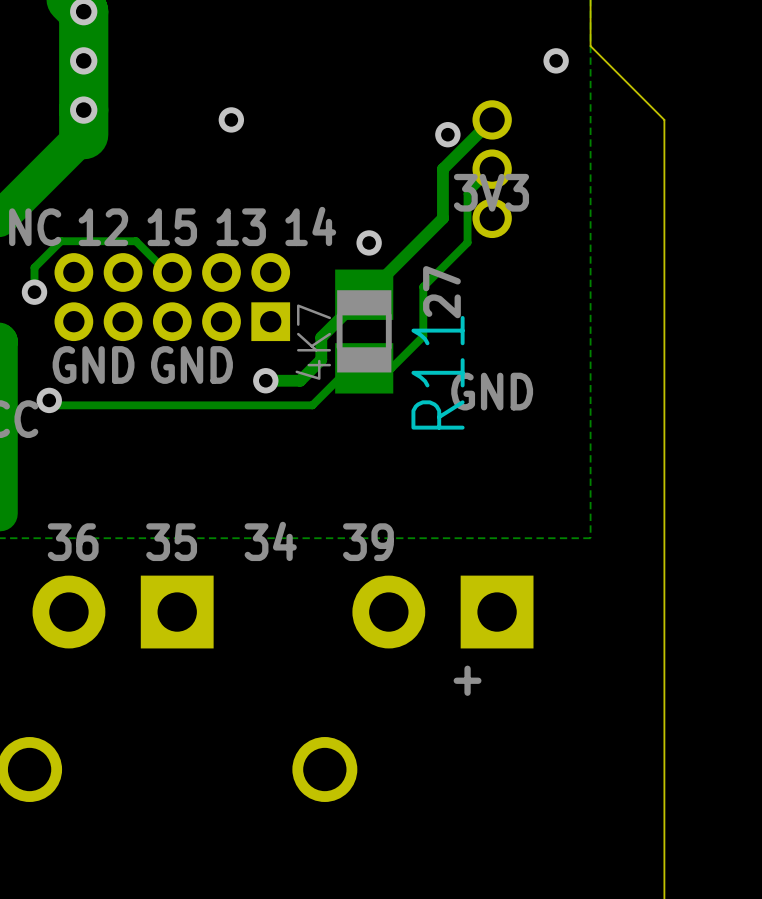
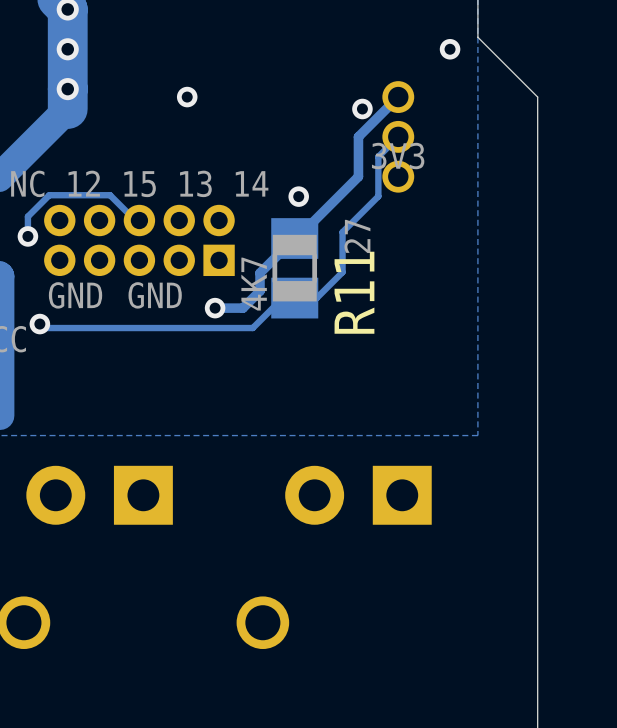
text: GND (492, 391) -> none
text: 34 (270, 541) -> none
text: 36 (73, 542) -> none
text: 35 (171, 542) -> none
text: 39 (368, 542) -> none
text: + (467, 680) -> none

